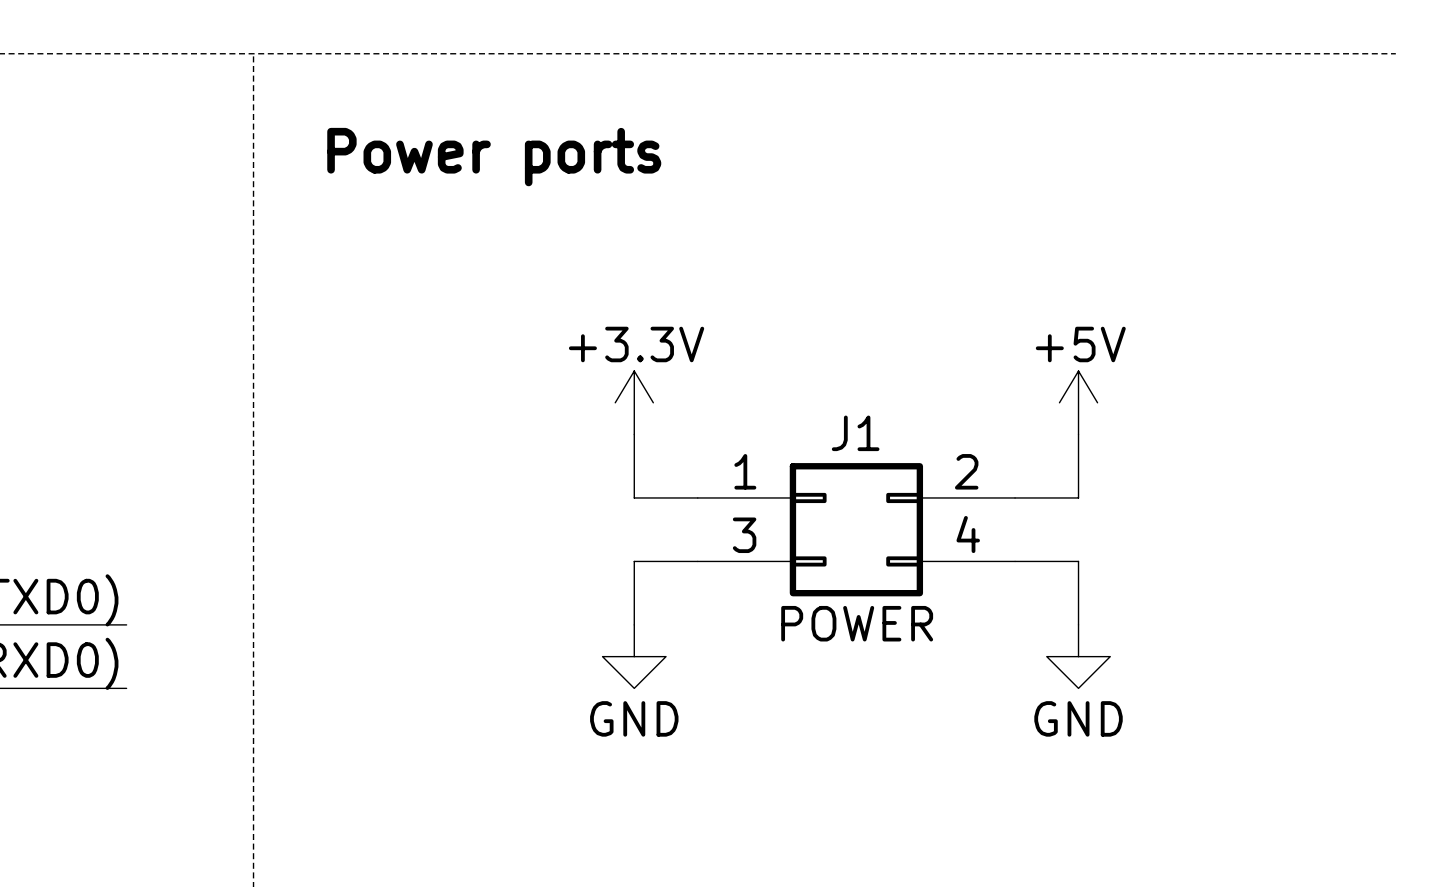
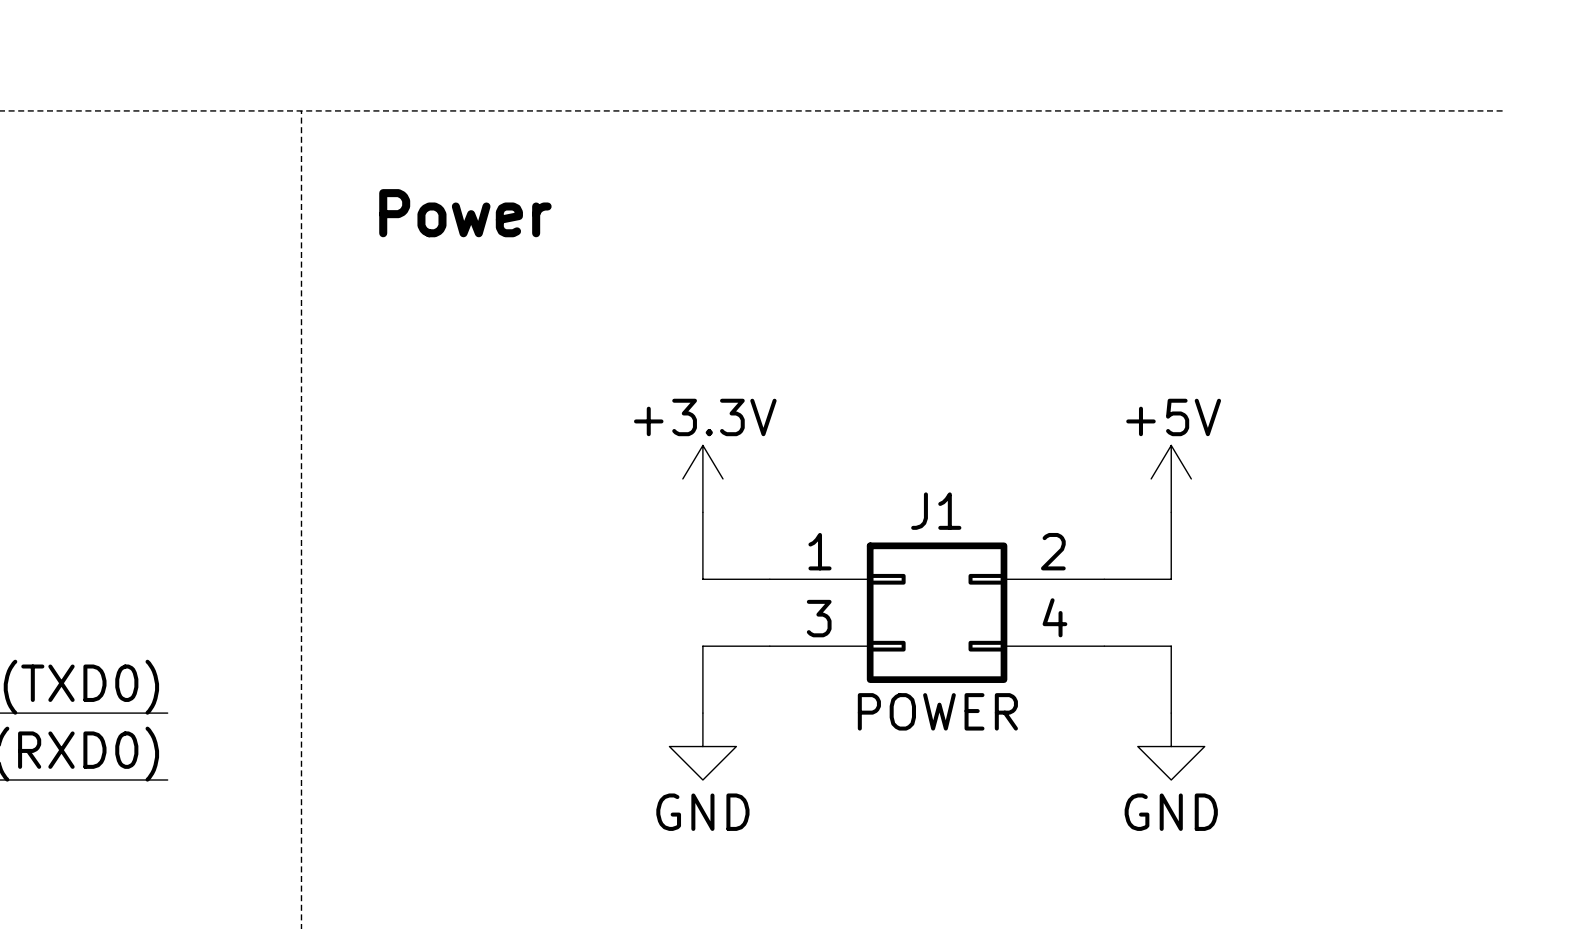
text: Power ports (494, 157) -> Power (465, 213)

